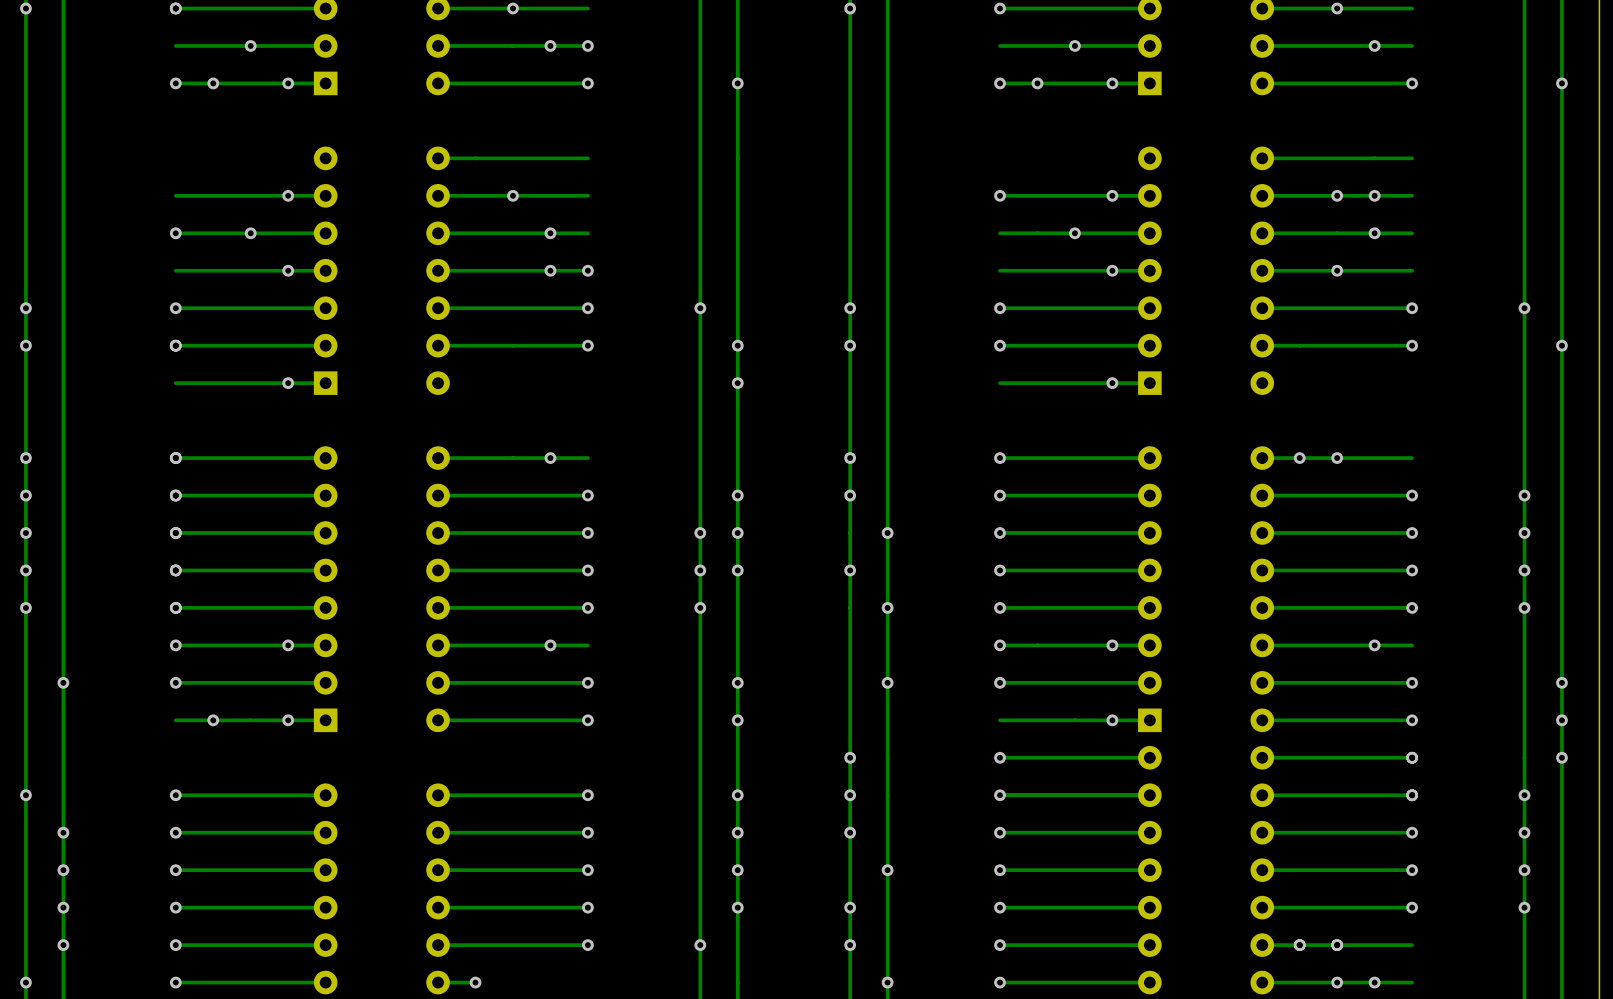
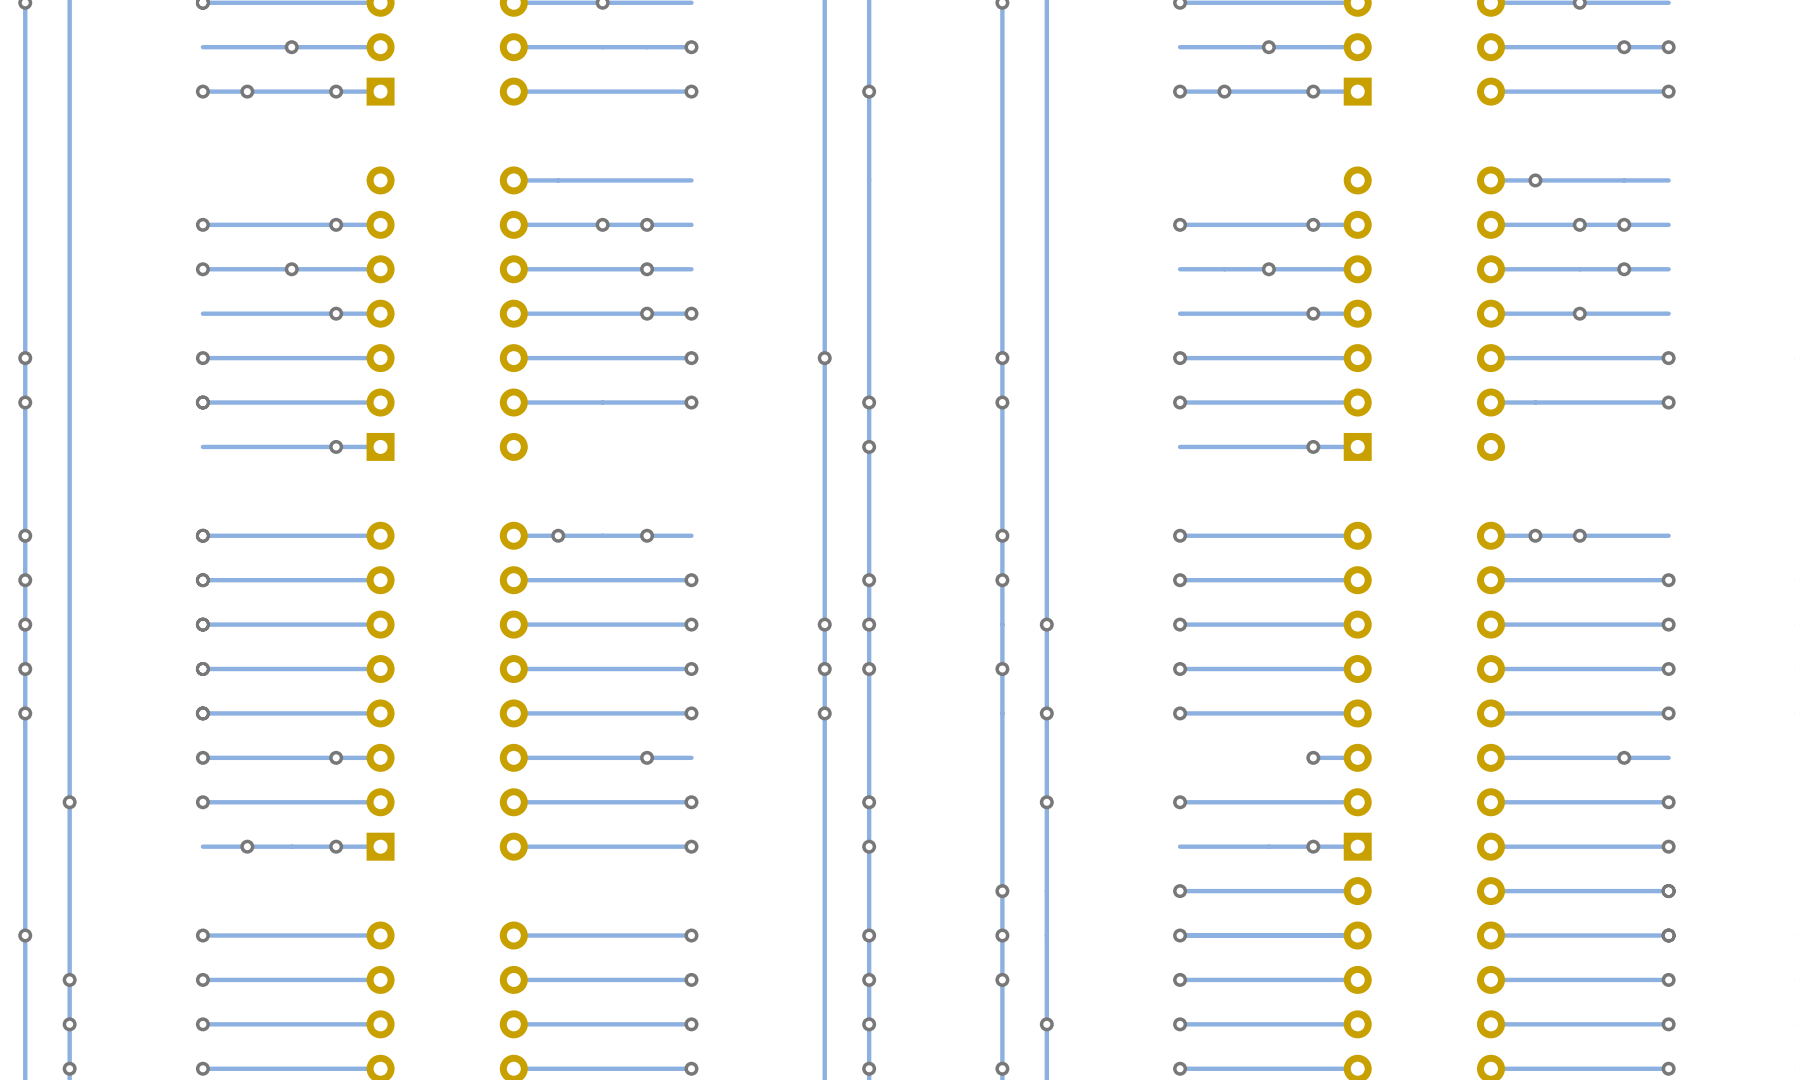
via: (550, 45) -> none
via: none -> (1668, 47)
via: none -> (1535, 180)
via: none -> (202, 224)
via: none -> (647, 224)
via: none -> (558, 535)
via: (1000, 645) -> none
track: (1112, 645) (1000, 645) -> none

